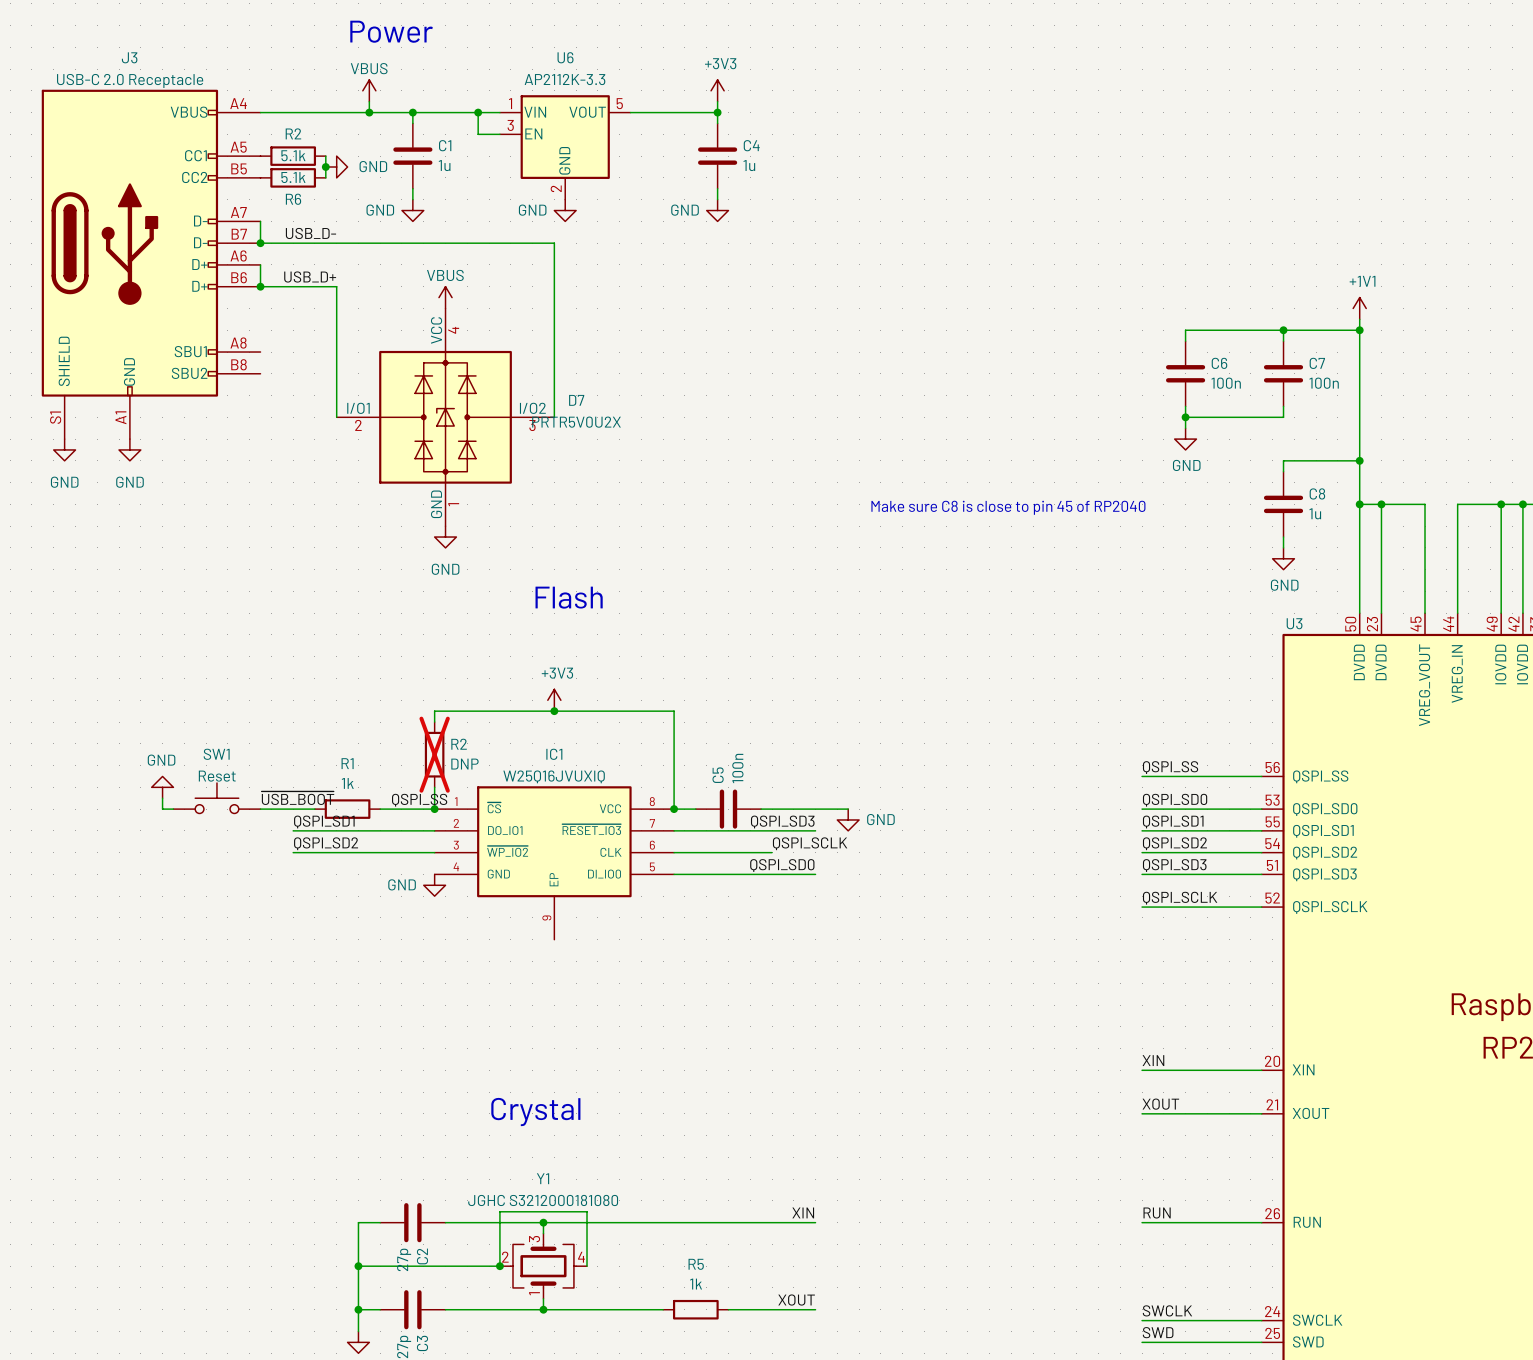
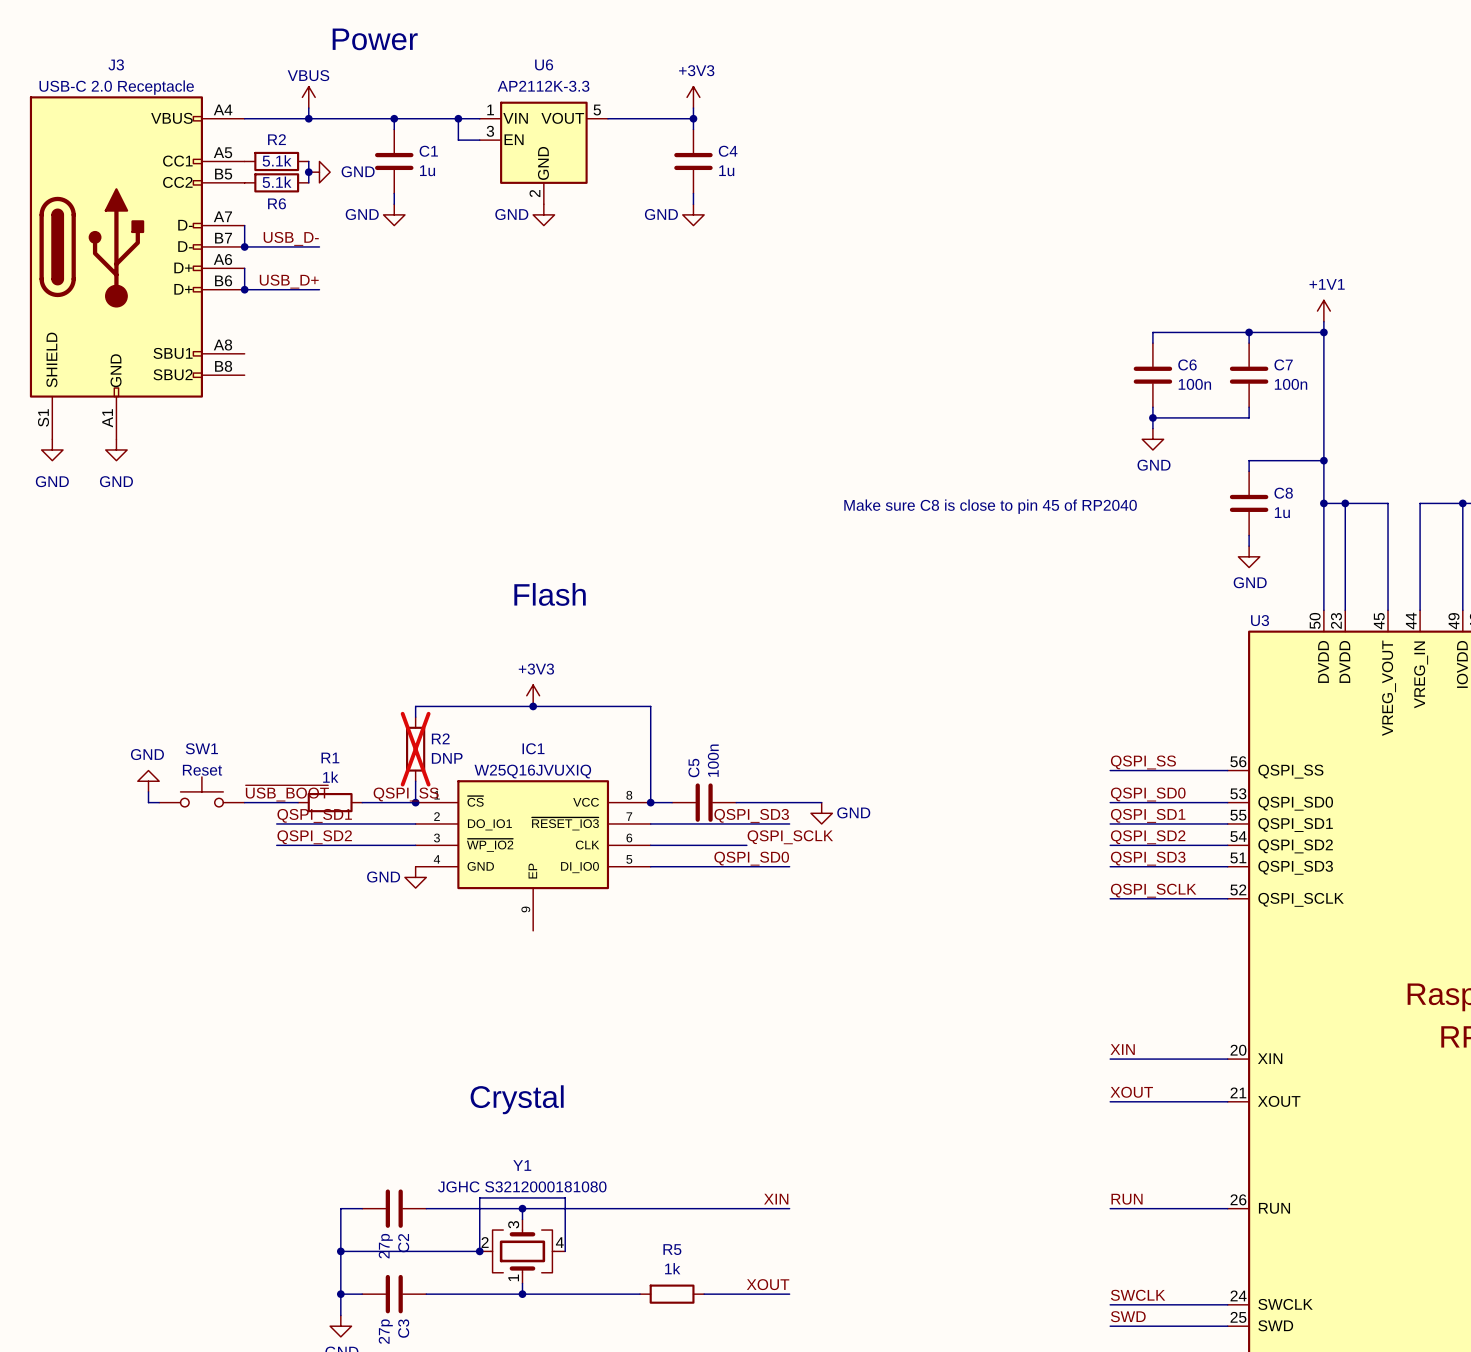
power symbol position: VBUS (369, 90) -> VBUS (308, 97)
wire: (369, 101) (369, 112) -> (308, 108) (308, 118)
junction position: (369, 112) -> (308, 118)
wire: (336, 243) (554, 243) (554, 417) -> none
wire: (336, 286) (336, 417) -> none
power symbol: VBUS (445, 297) -> none
D7: PRTR5V0U2X (445, 417) -> none
power symbol: GND (445, 537) -> none

